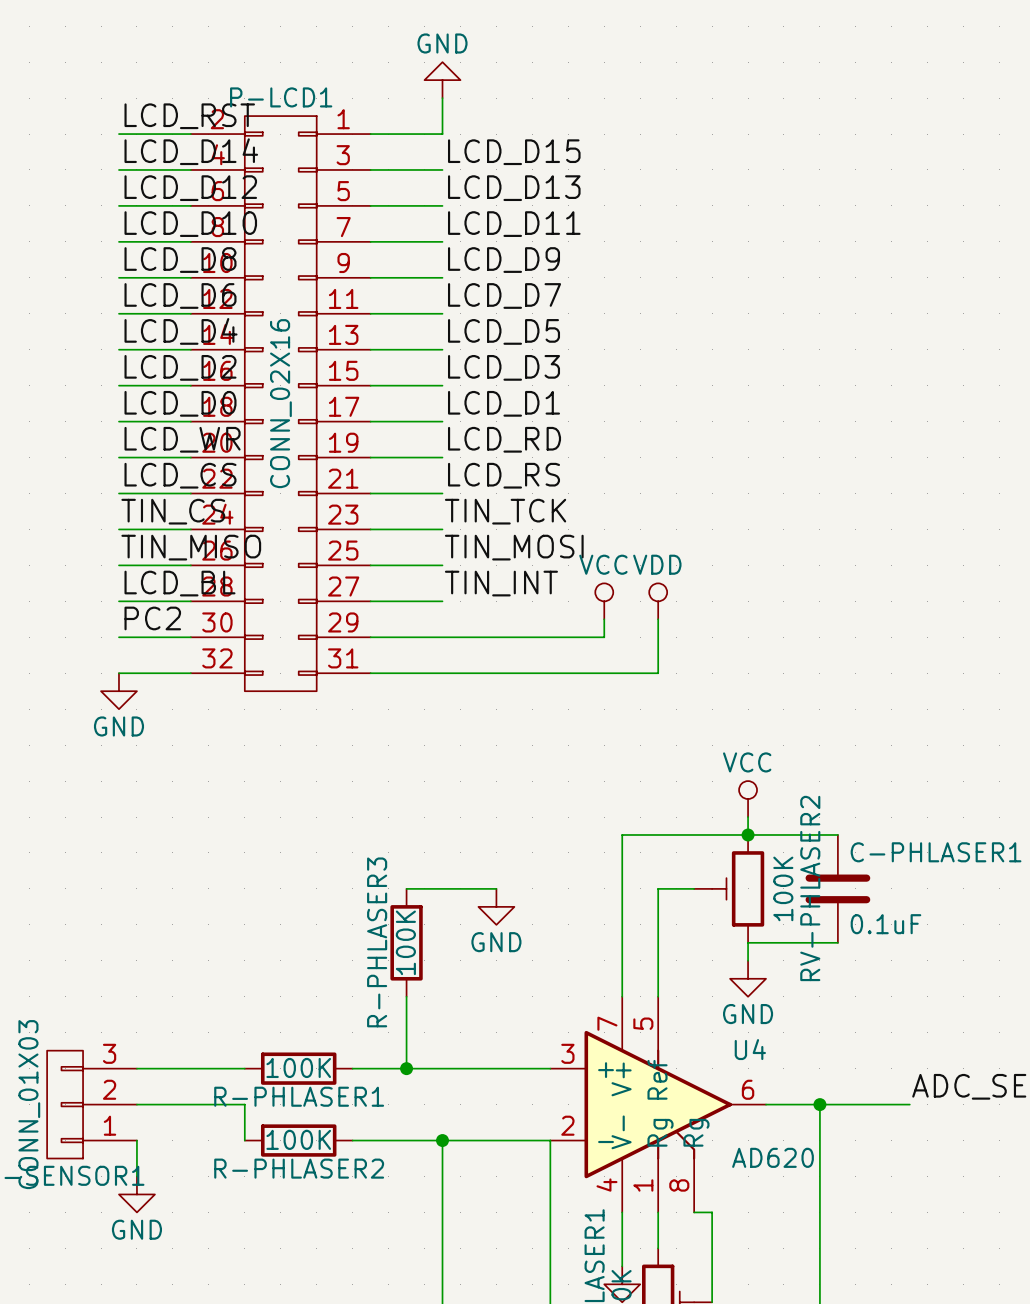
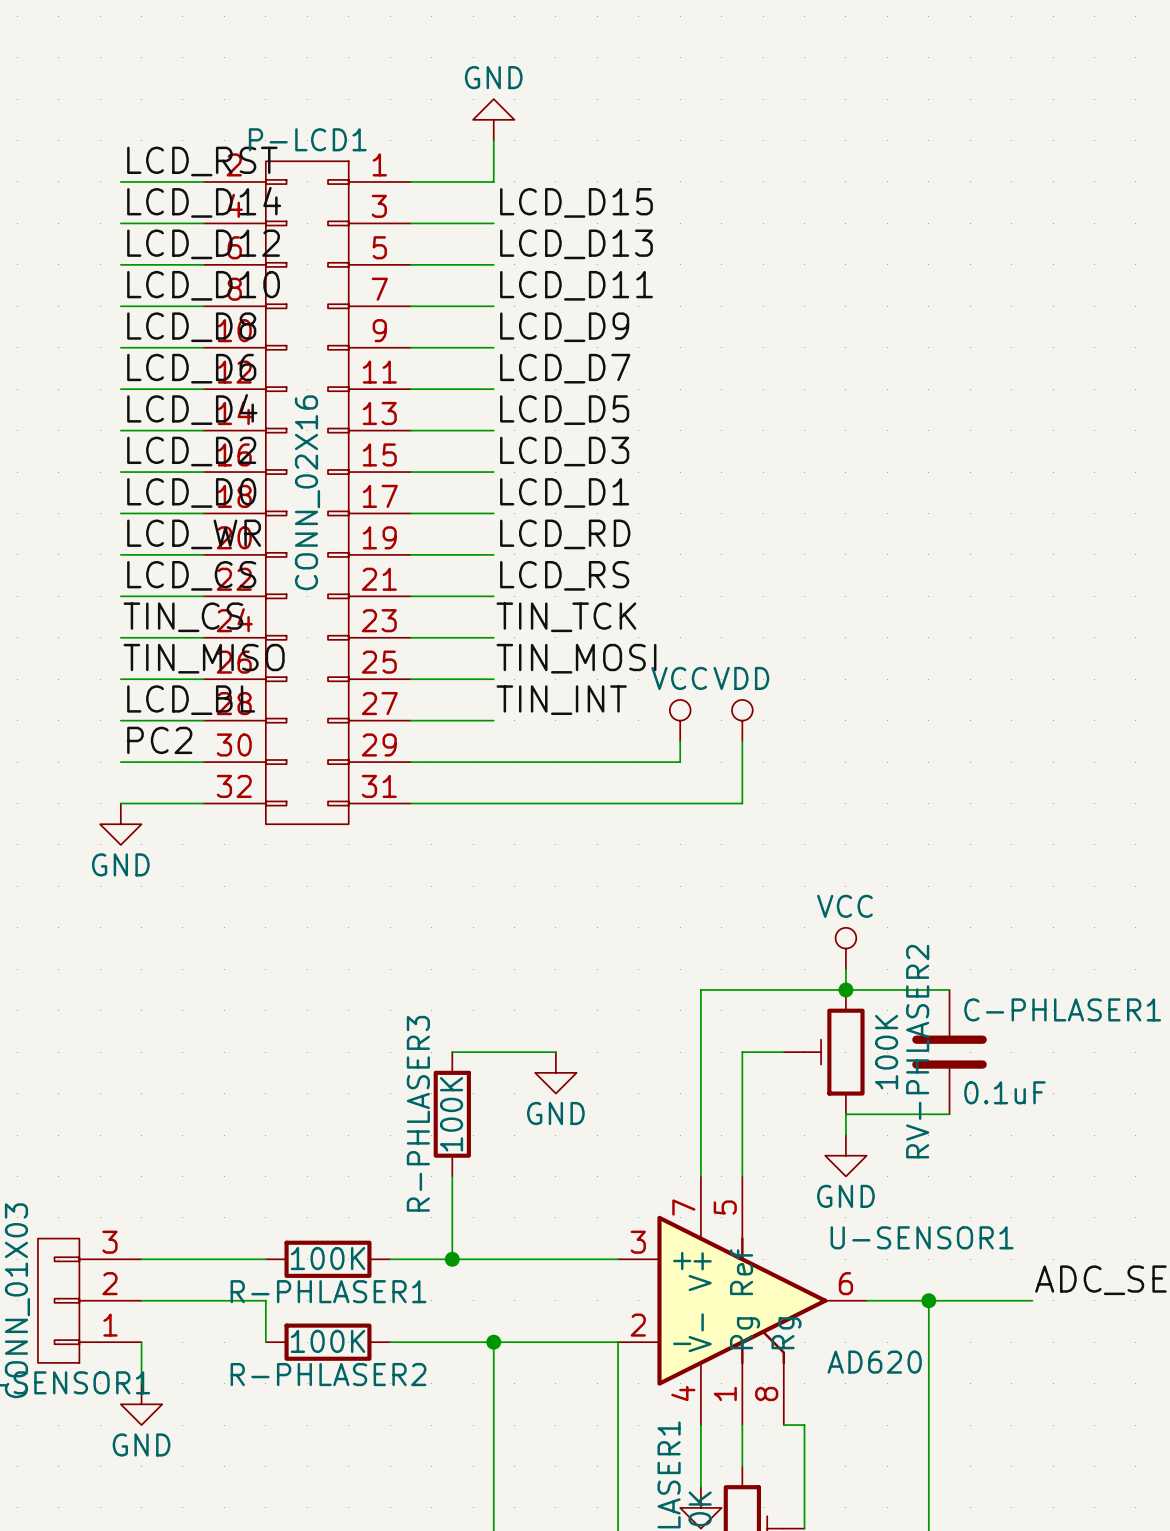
U4 name: U4 (750, 1049) -> U-SENSOR1 (922, 1237)

